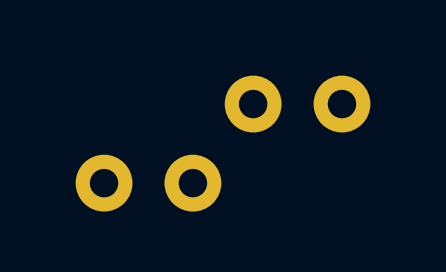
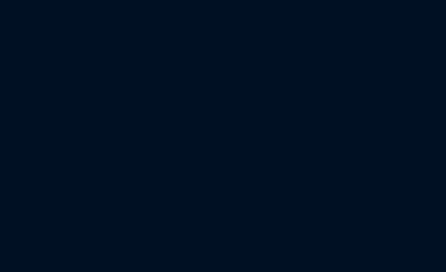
part: (297, 104) -> none
part: (148, 183) -> none

